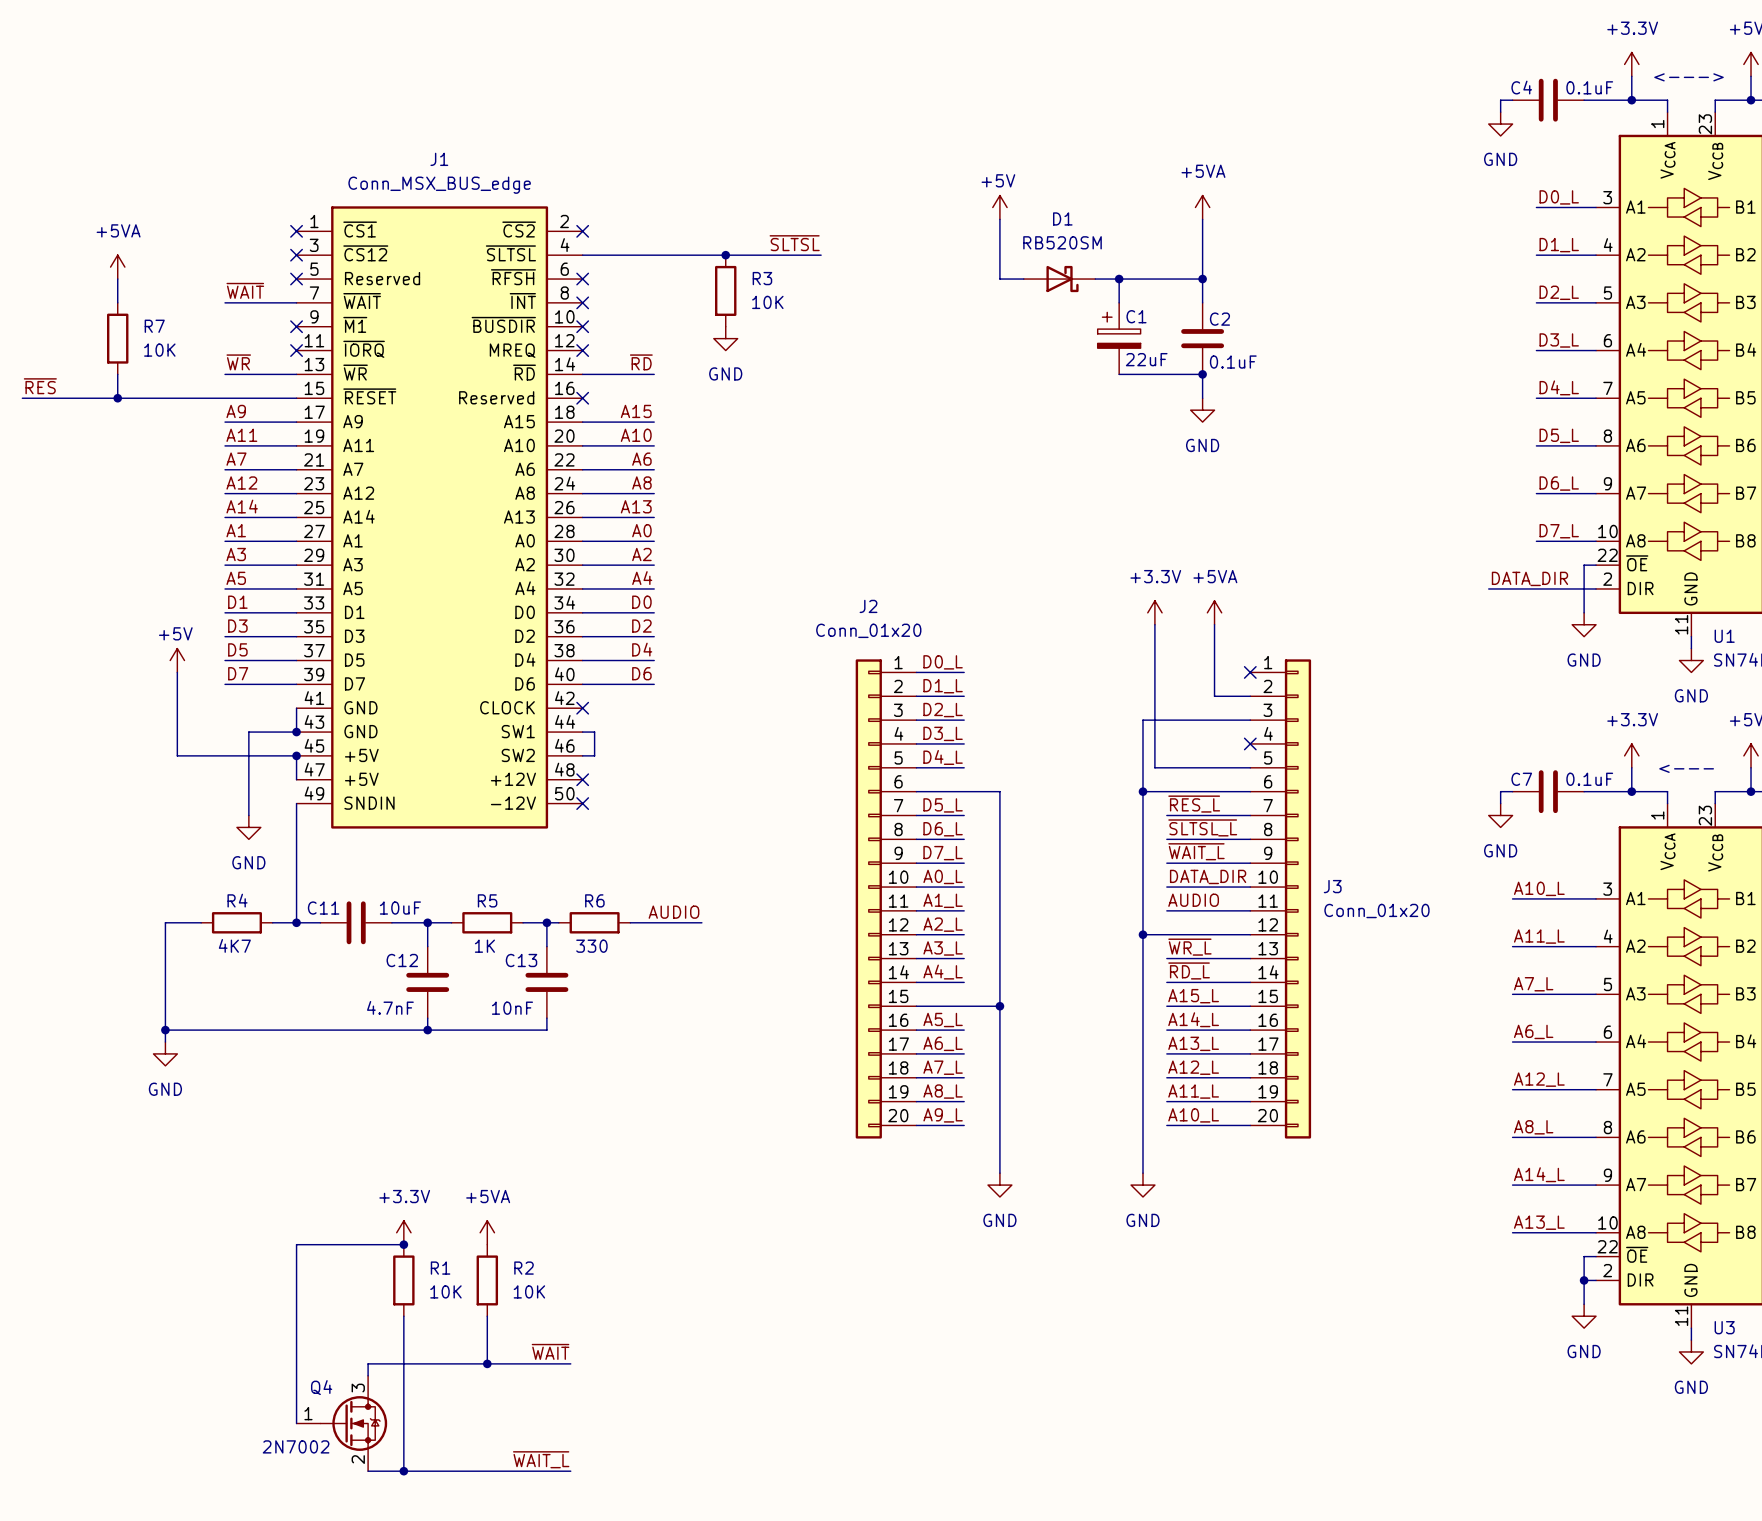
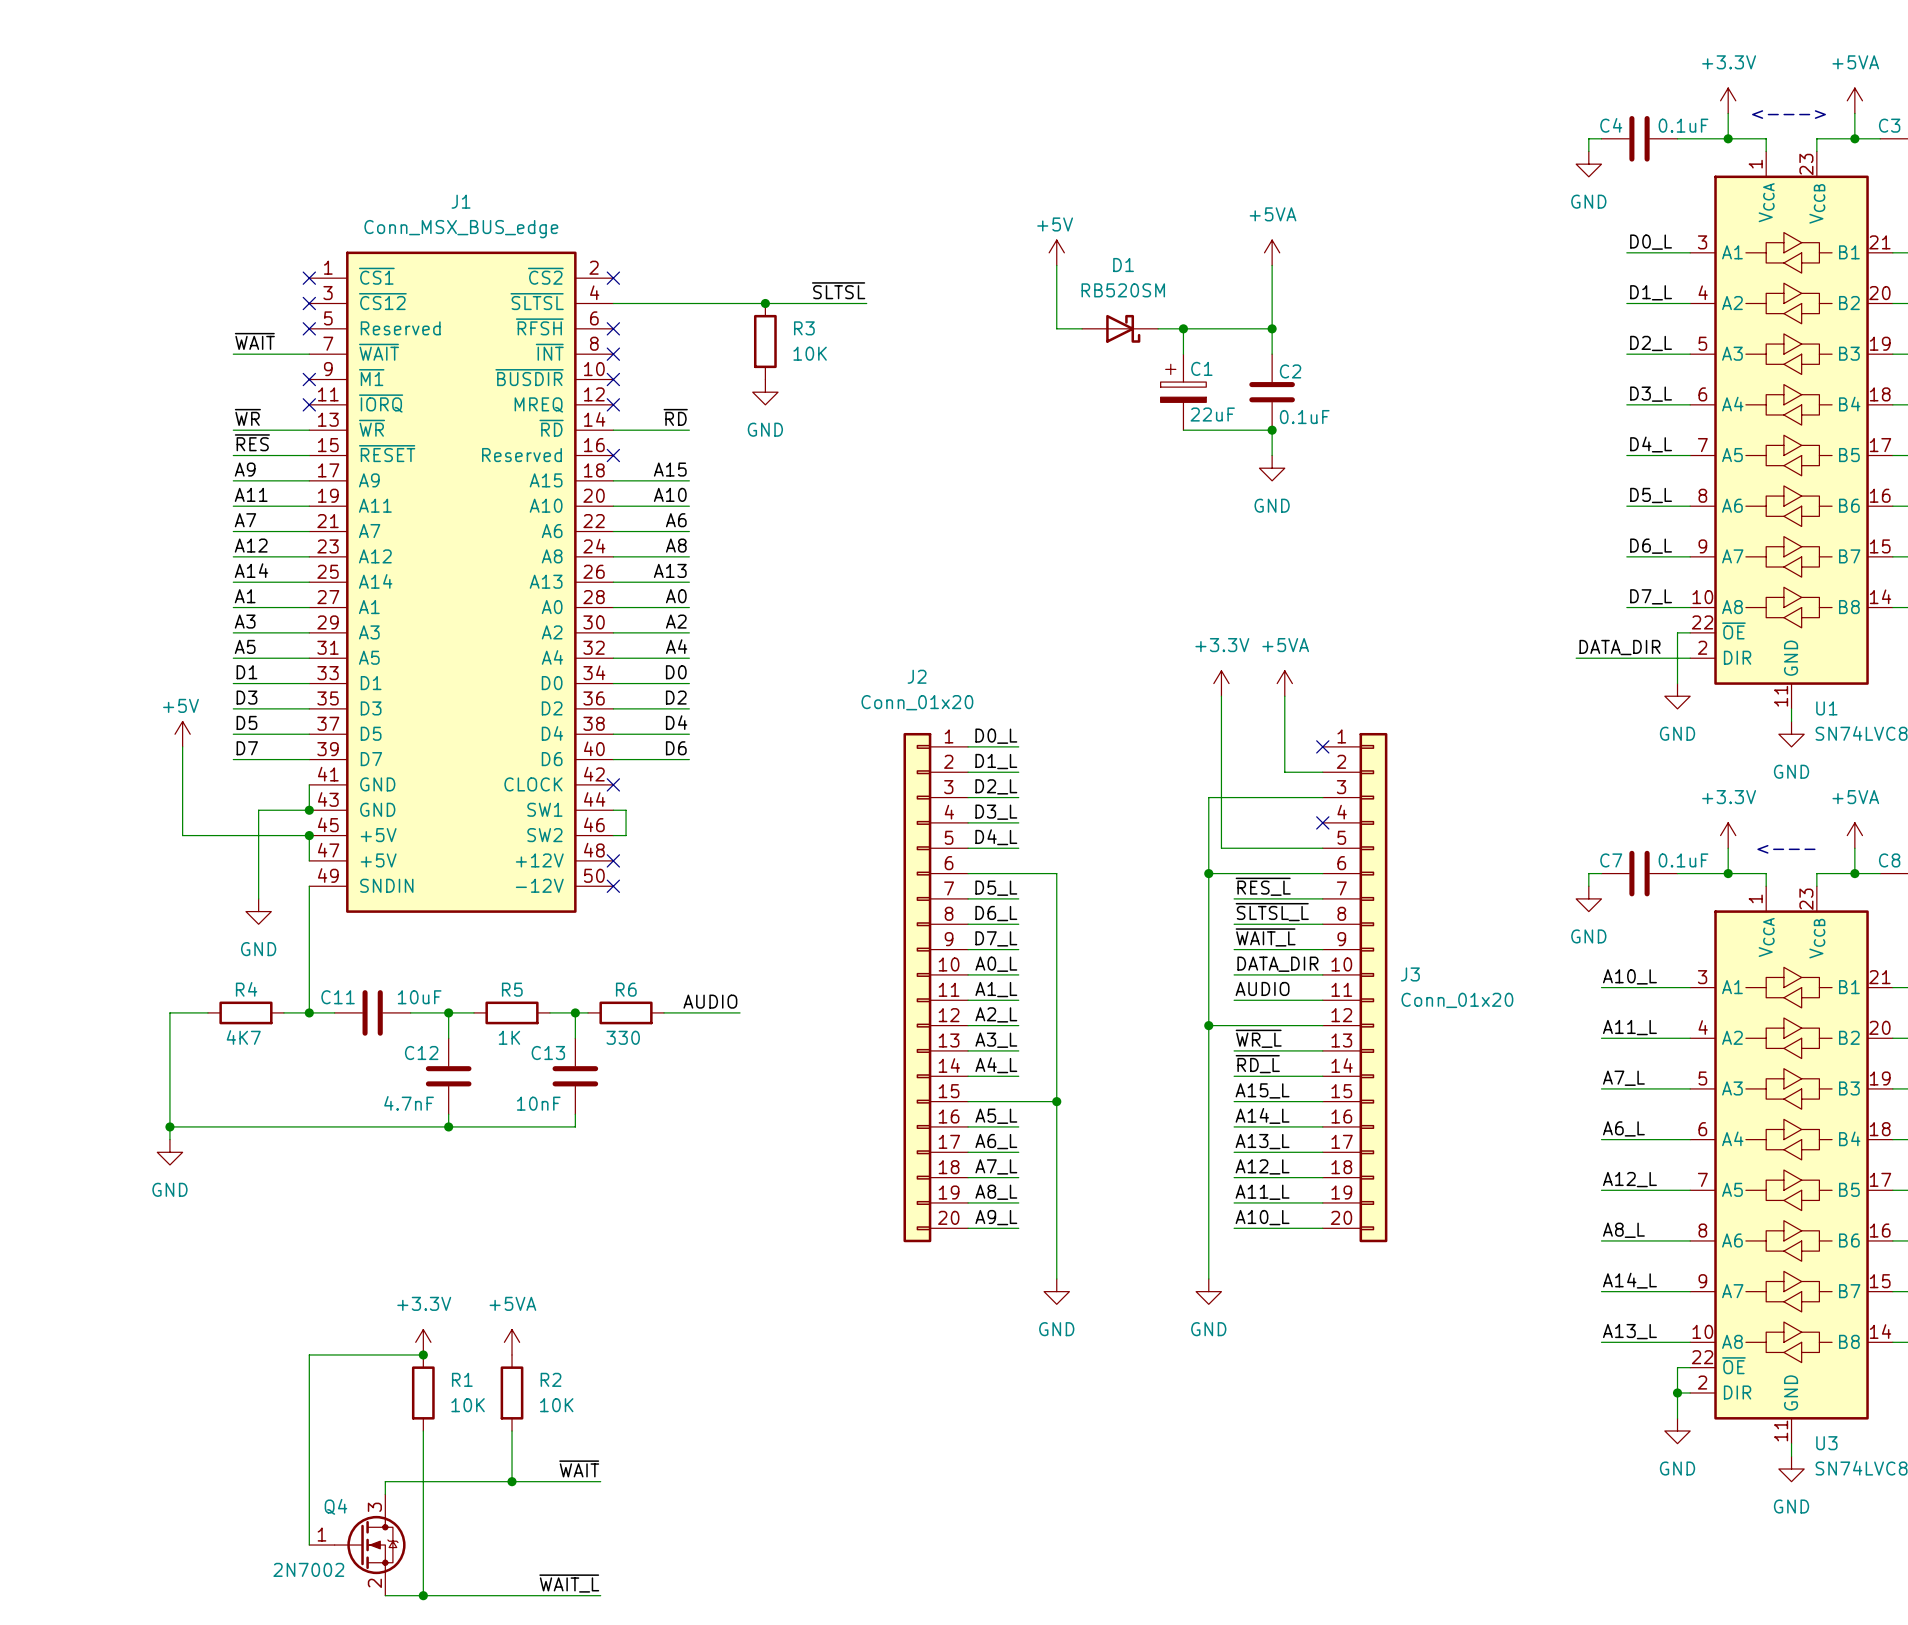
power symbol: +5VA (117, 267) -> none
wire: (117, 279) (117, 302) -> none
R7: 10K (117, 338) -> none
wire: (117, 374) (117, 398) -> none
label position: ~{RES} (40, 386) -> ~{RES} (252, 442)
wire: (22, 398) (225, 398) -> none
junction: (117, 398) -> none

